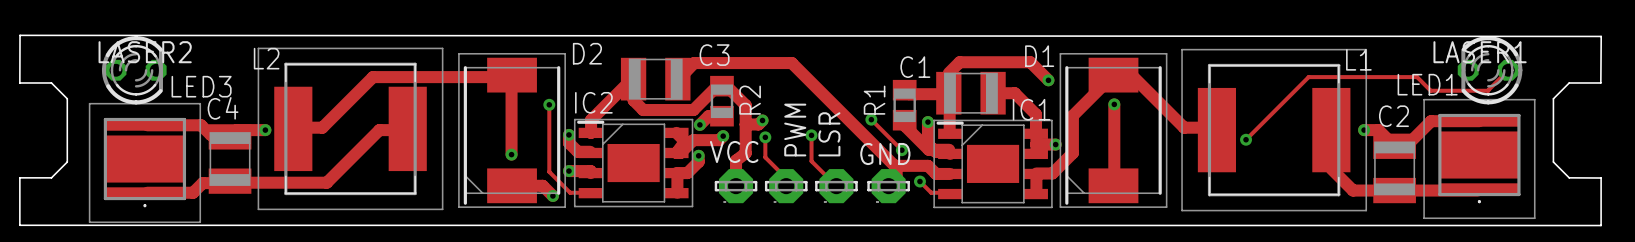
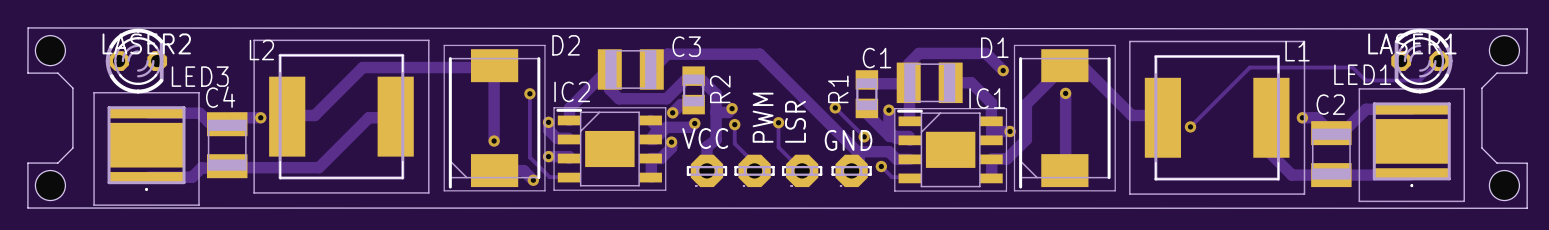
hole: none -> (50, 50)
hole: none -> (1504, 50)
hole: none -> (50, 185)
hole: none -> (1504, 185)

